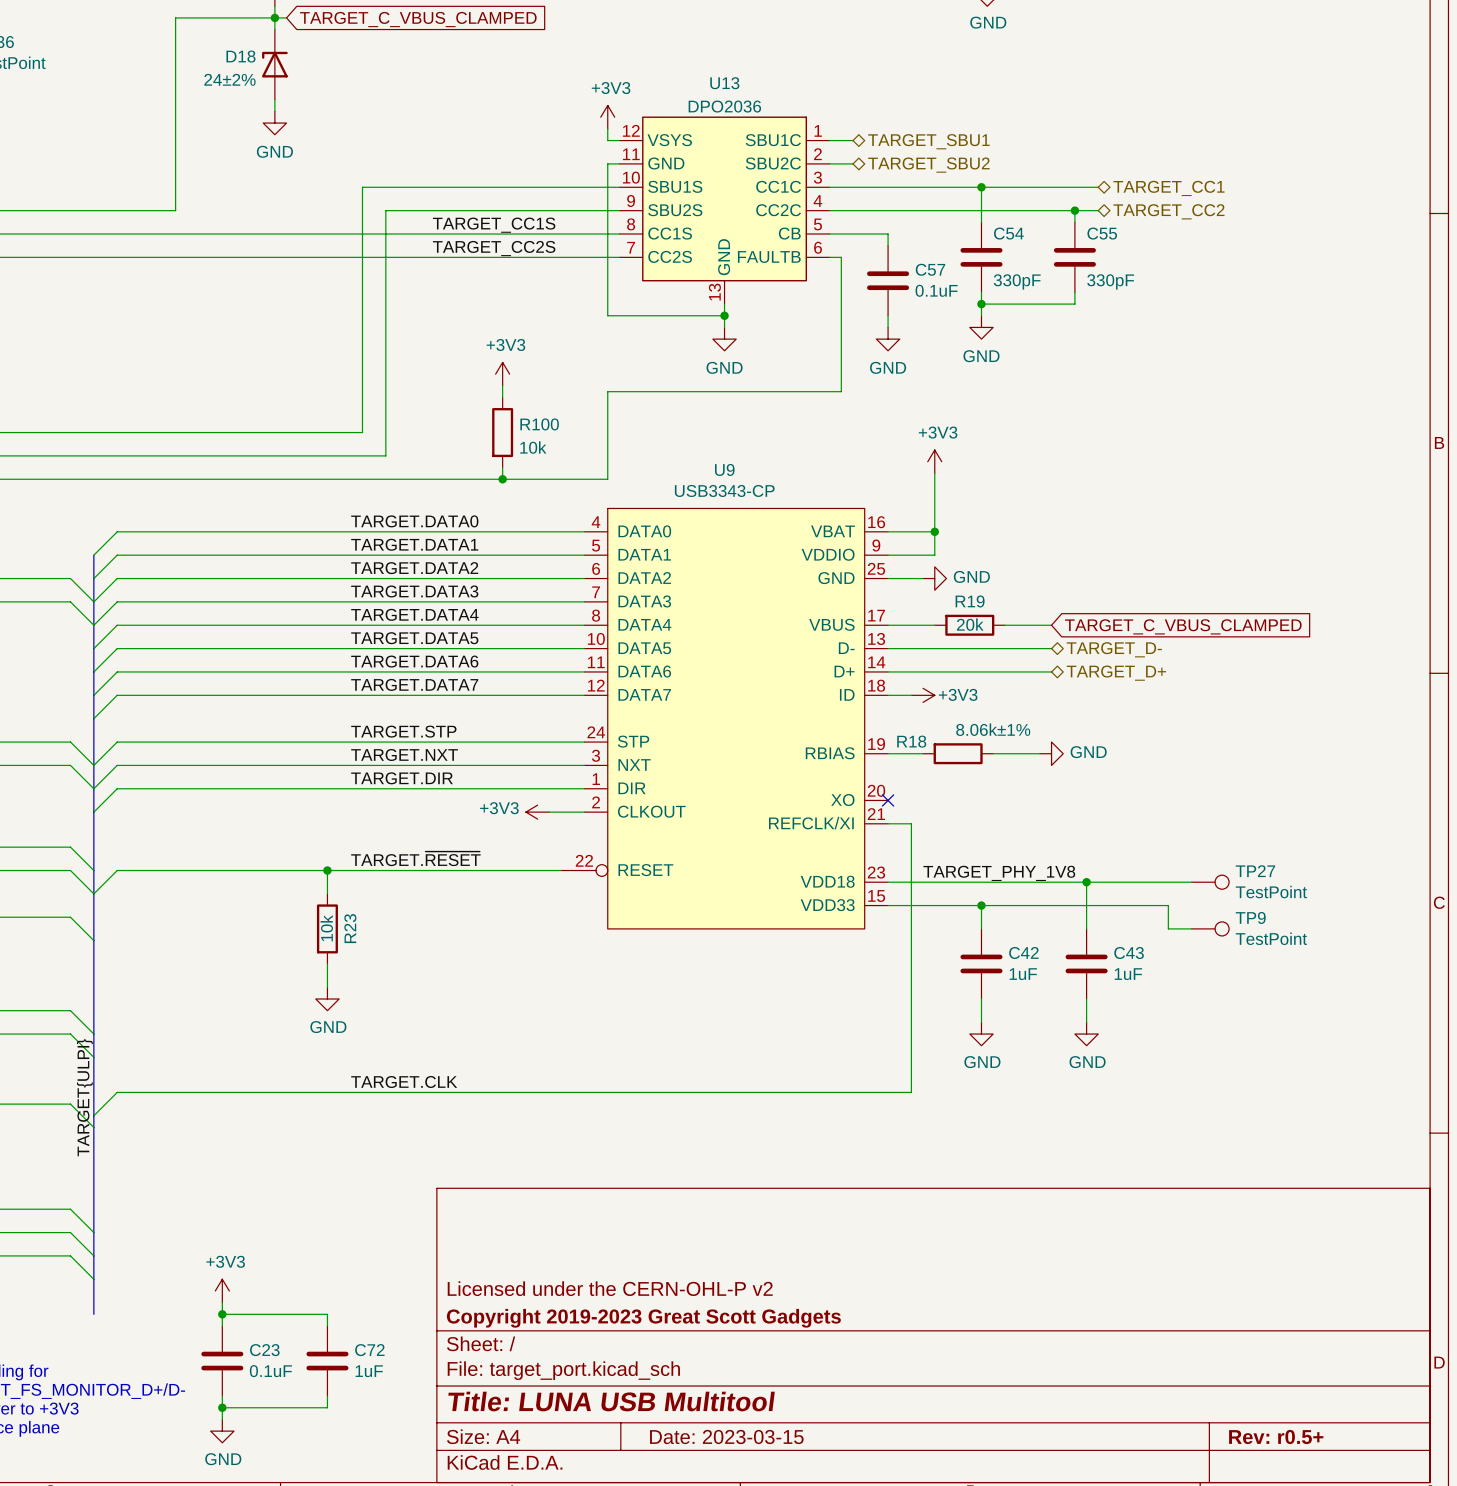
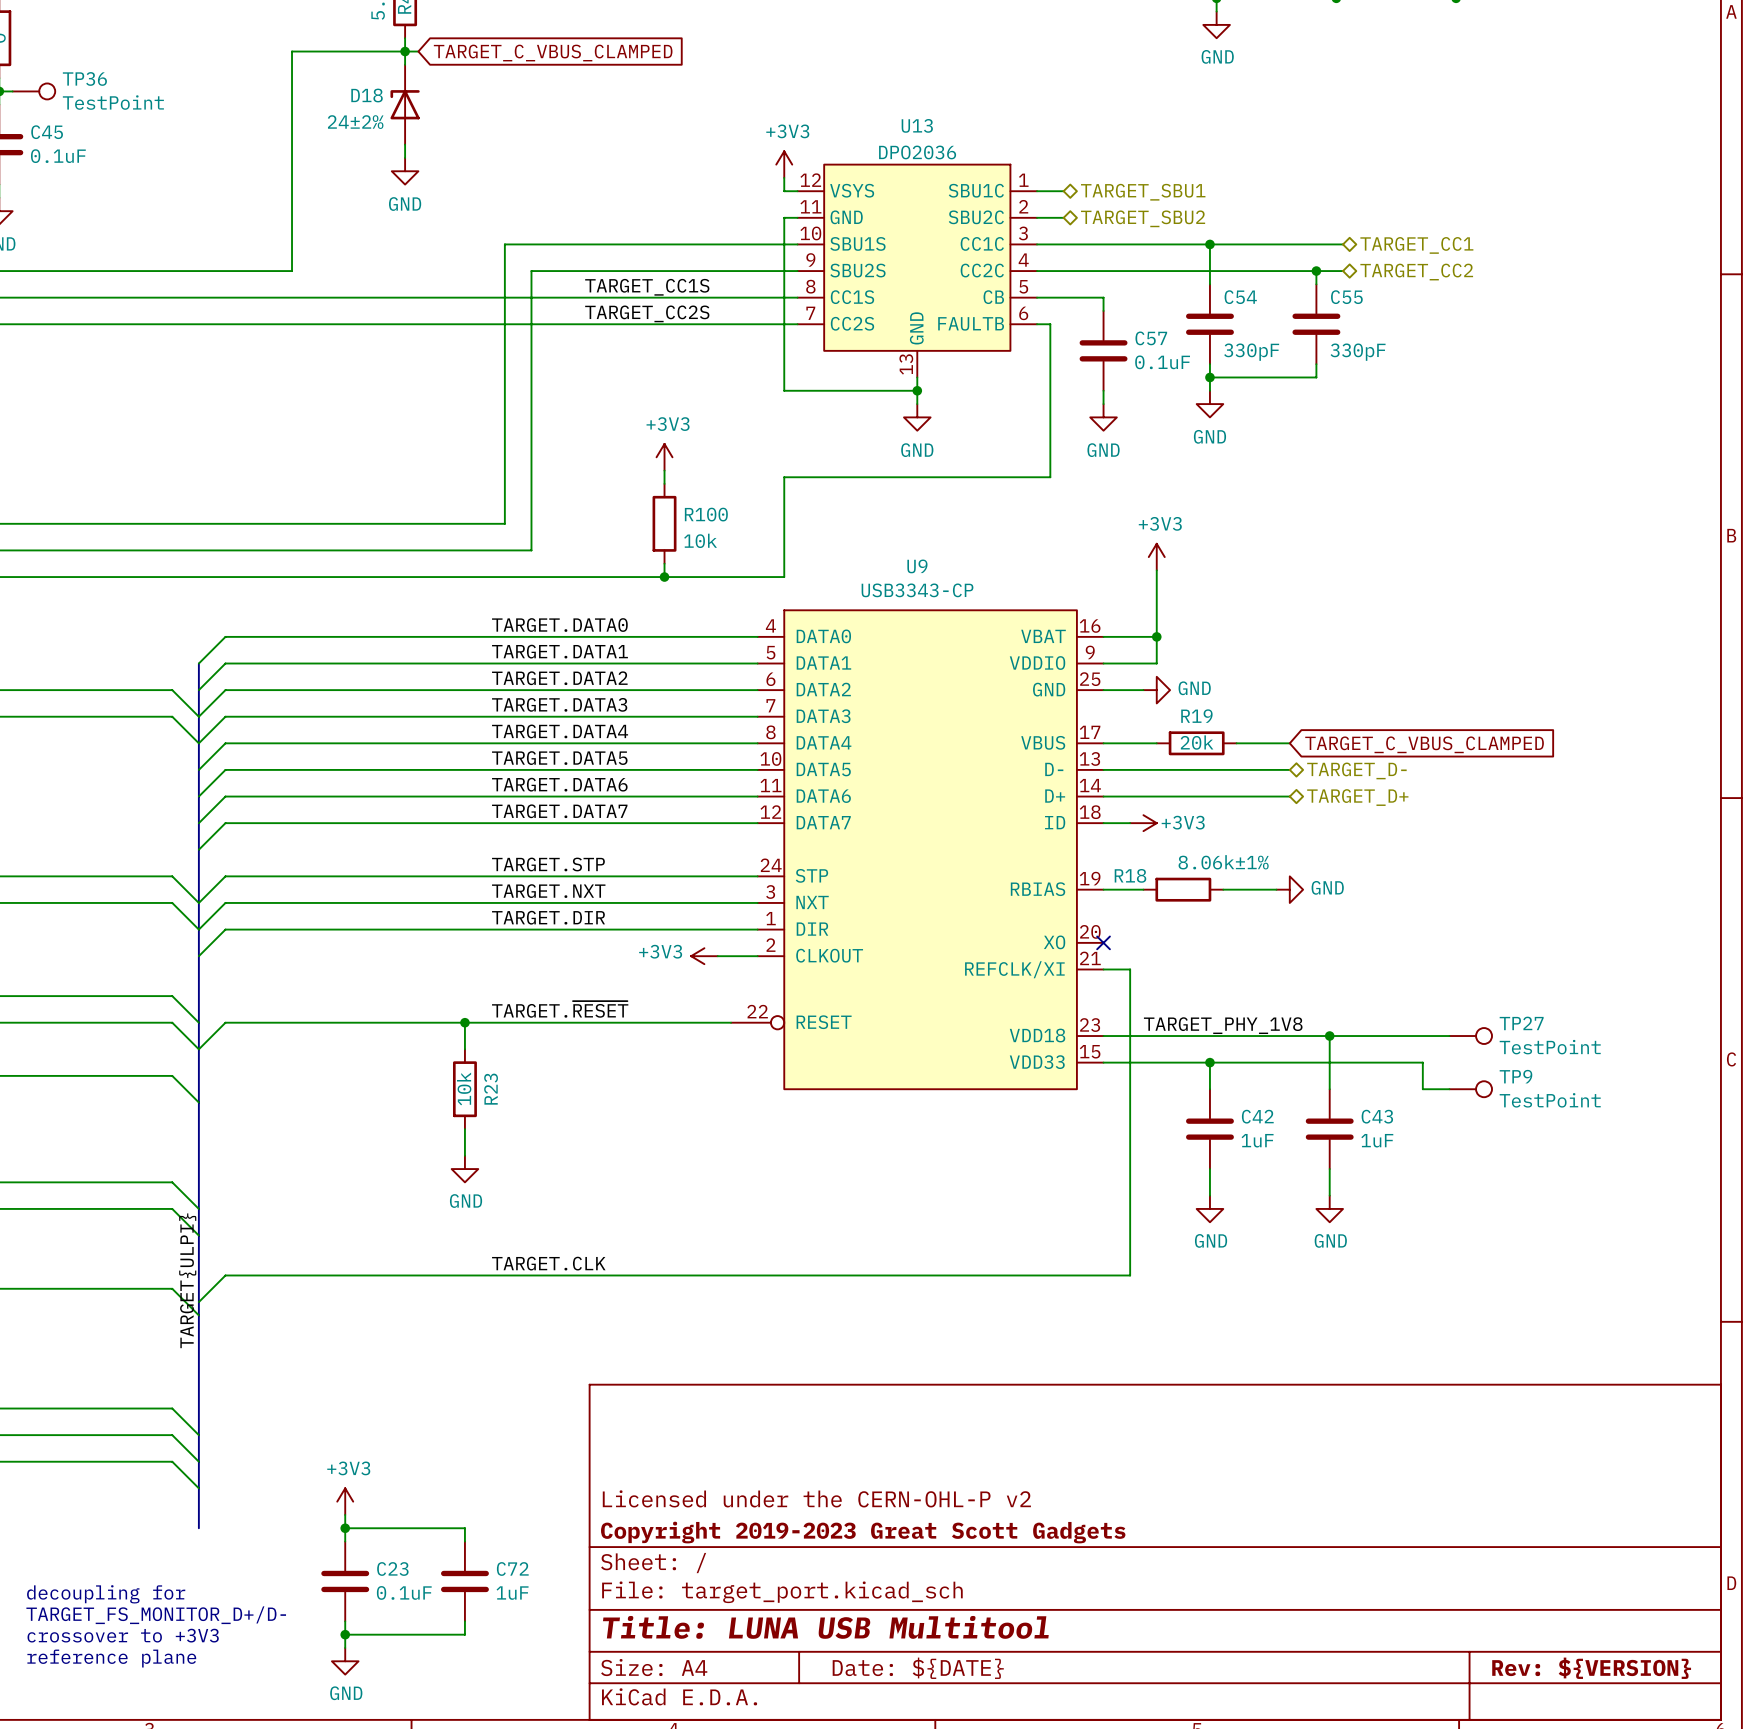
title block: Date: 2023-03-15 (726, 1436) -> Date: ${DATE} (918, 1668)
title block: Rev: r0.5+ (1276, 1436) -> Rev: ${VERSION} (1591, 1668)

